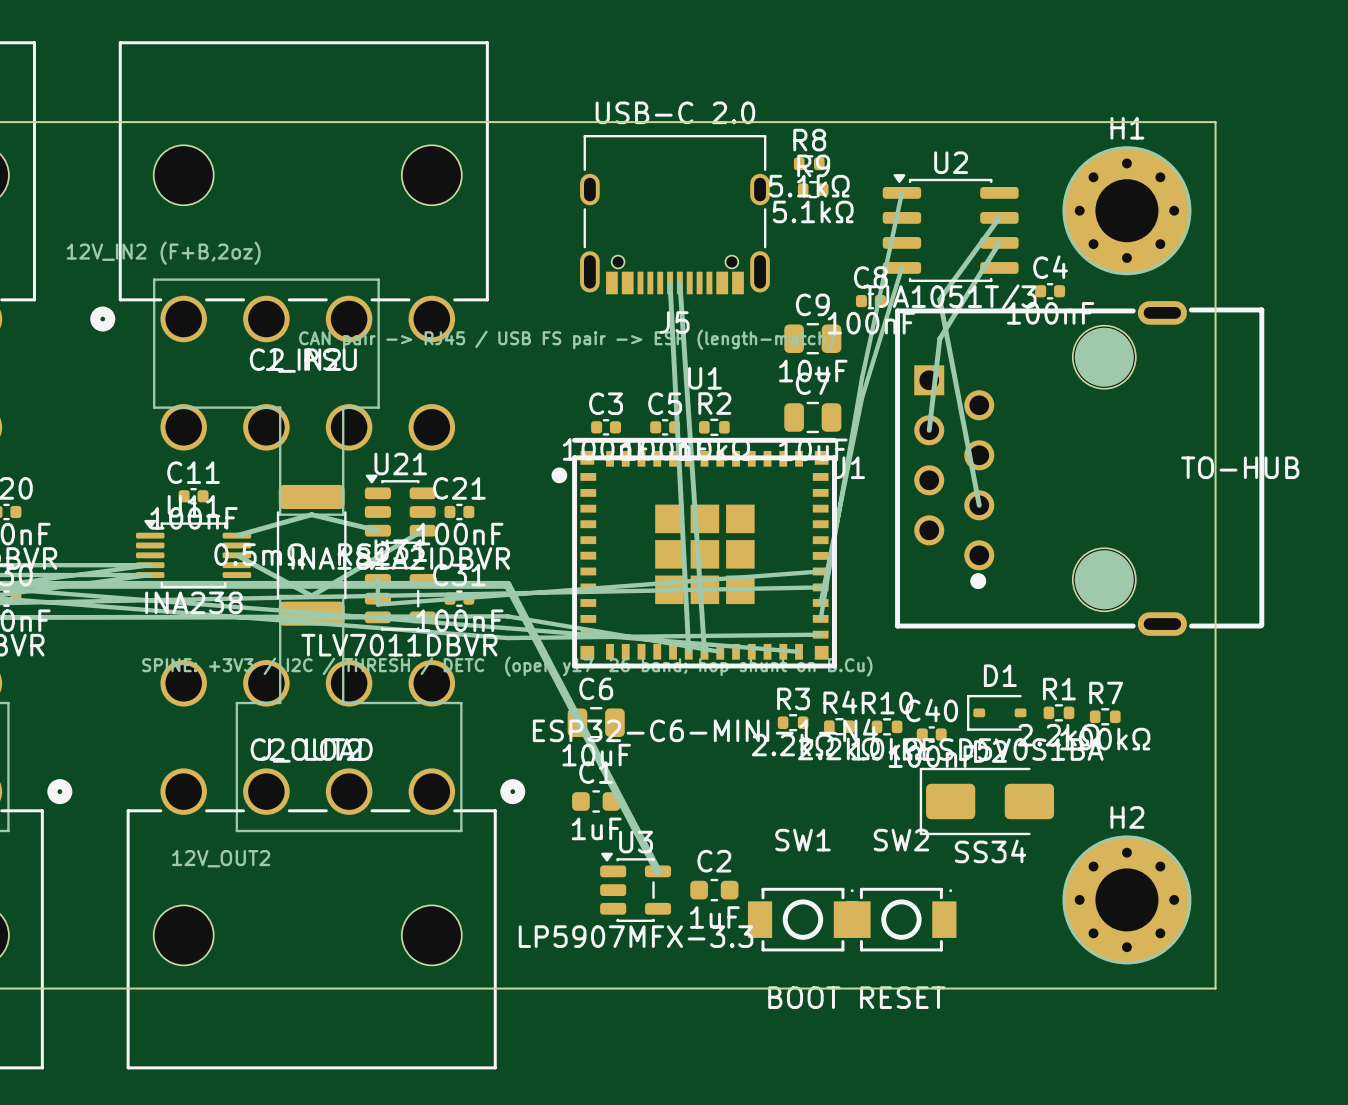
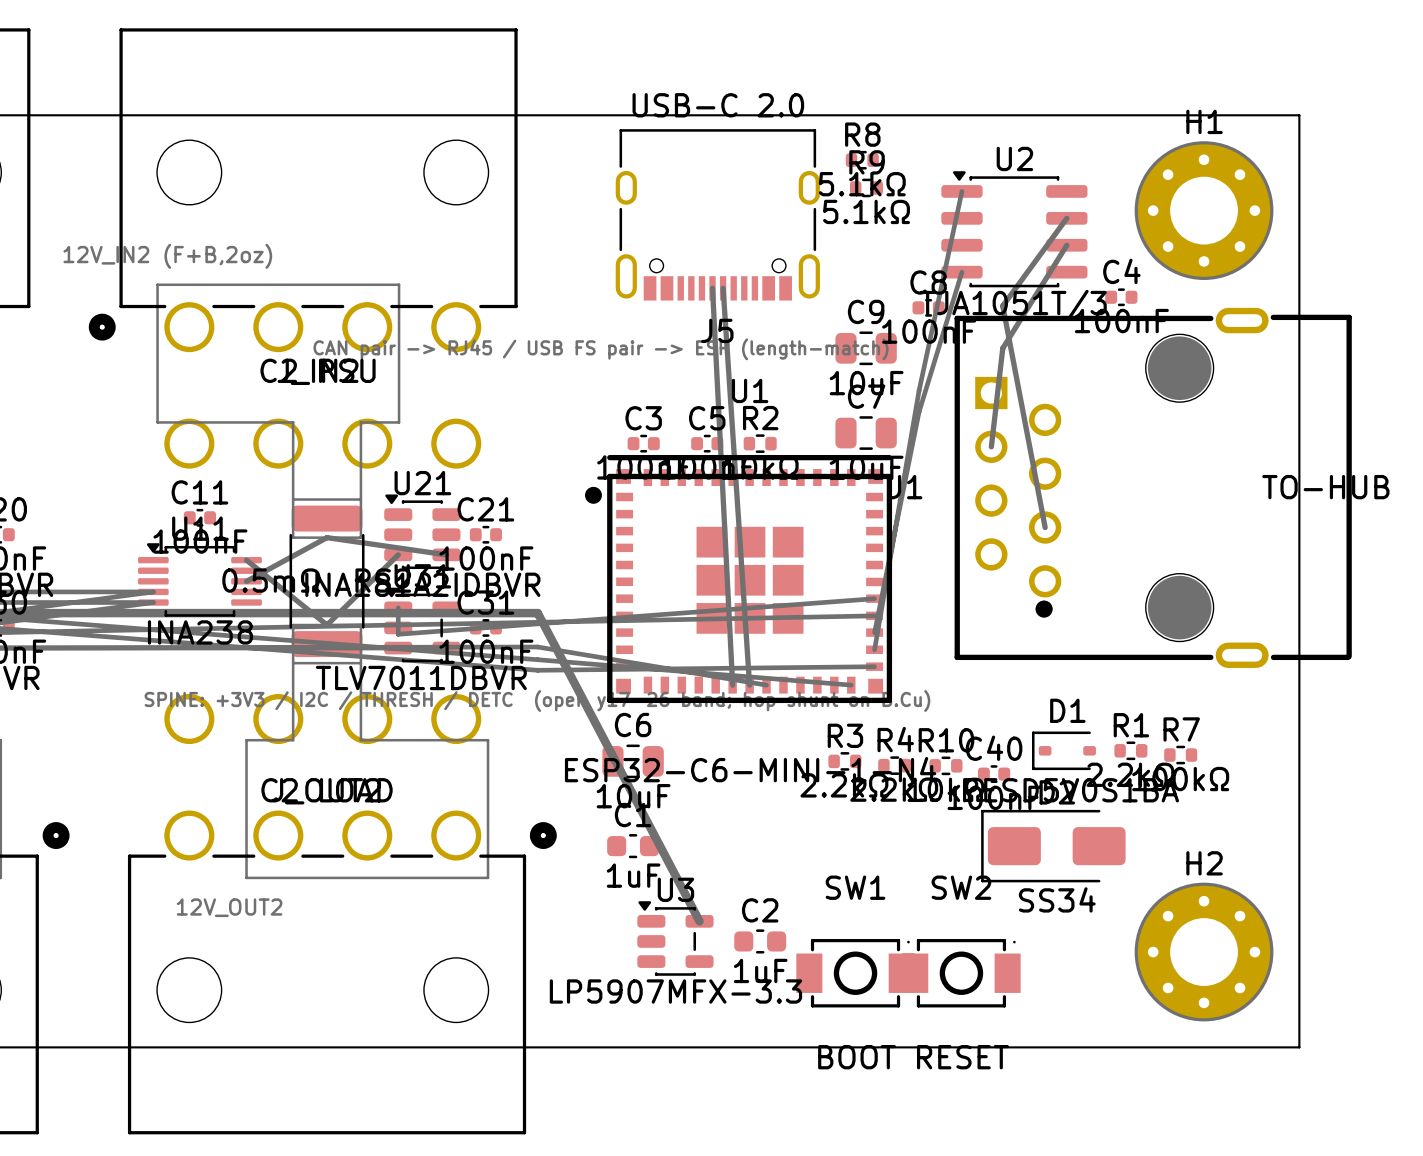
line: none -> (293, 499) (360, 499)
line: (377, 530) (311, 514) (236, 535) -> (398, 554) (327, 625) (246, 560)
line: (422, 530) (311, 595) (236, 555) -> (446, 554) (327, 537) (246, 581)
line: none -> (293, 663) (360, 663)

